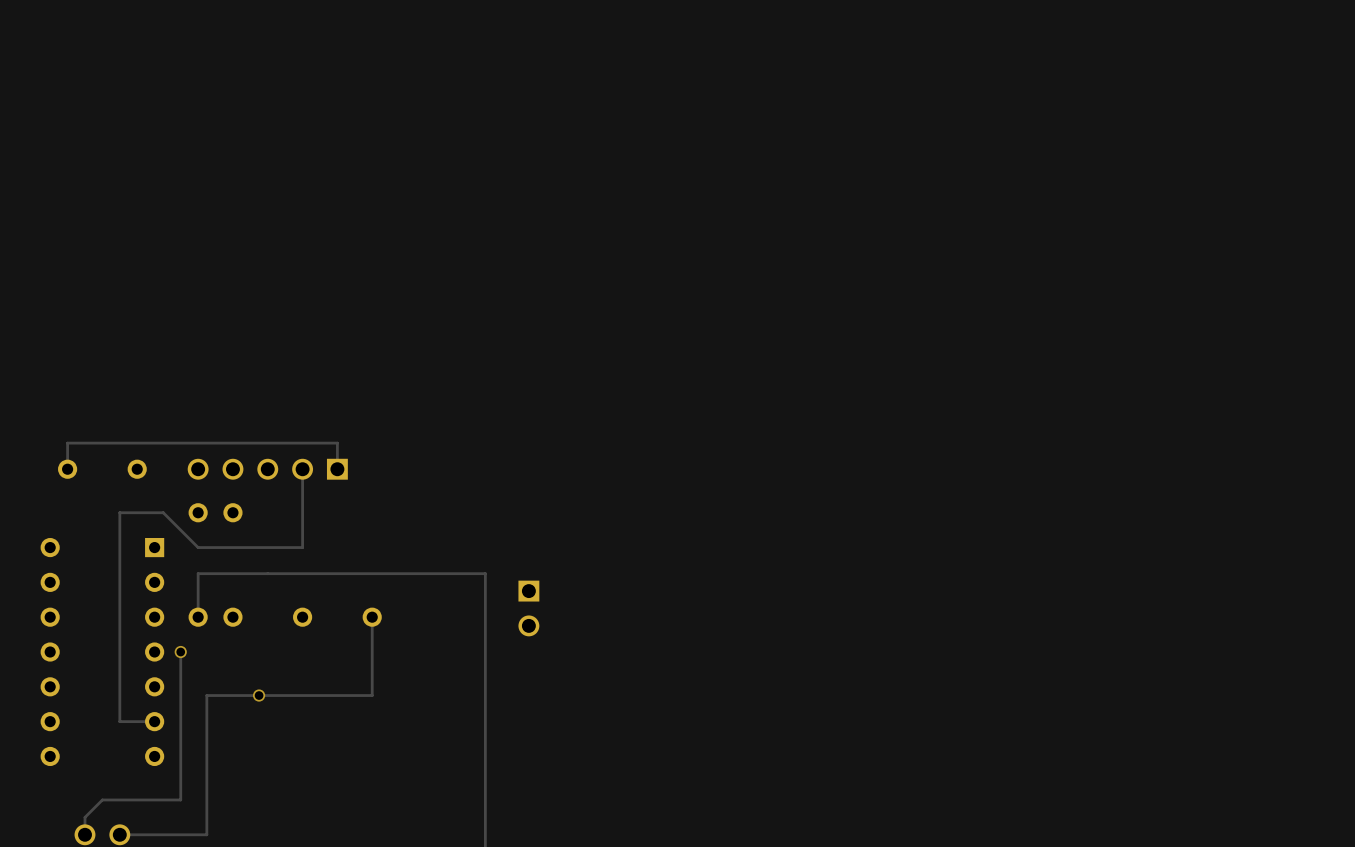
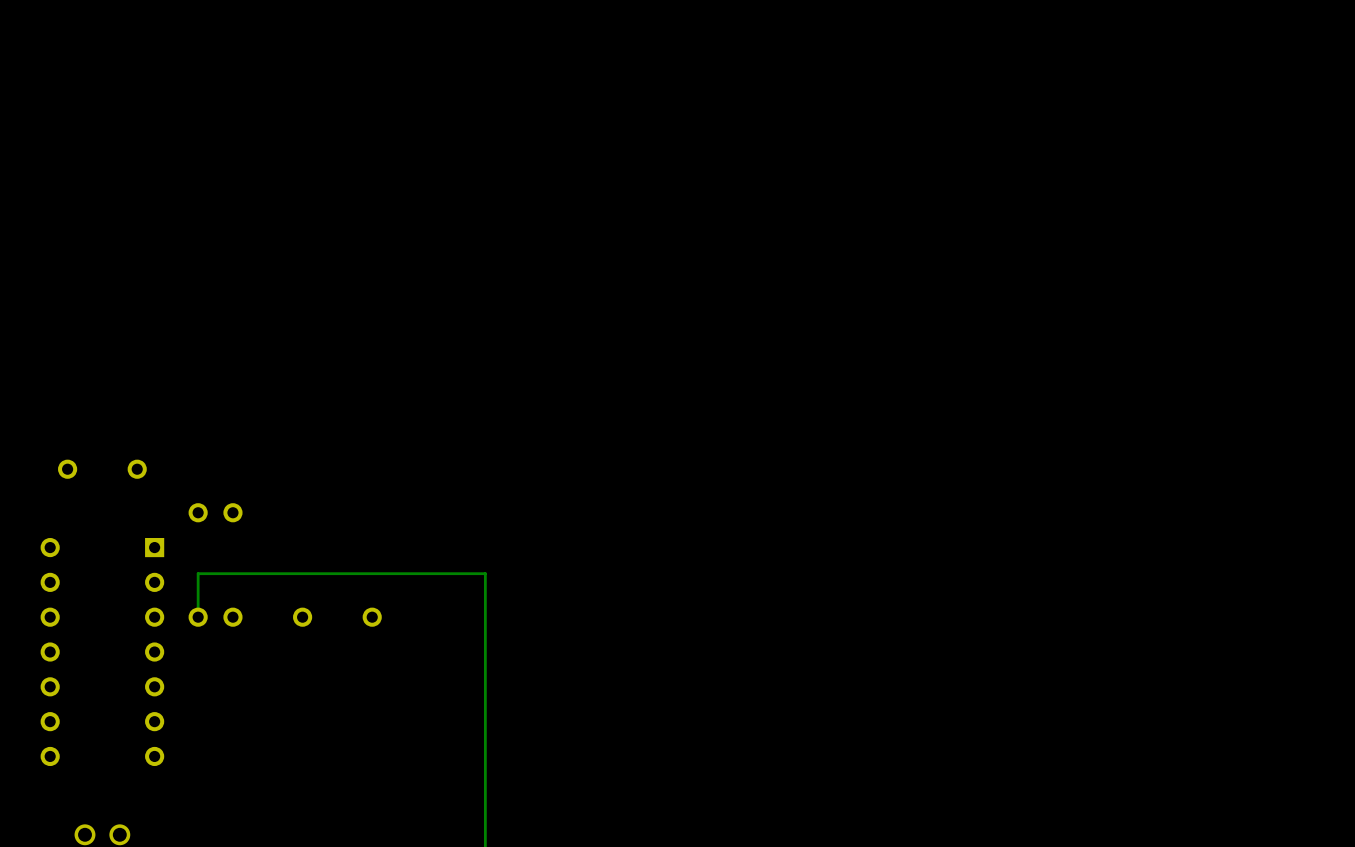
part: (267, 469) -> none
track: (302, 469) (302, 547) (198, 547) (163, 512) (119, 512) (119, 721) (154, 721) -> none
track: (337, 469) (337, 443) (67, 443) (67, 469) -> none
part: (528, 608) -> none
track: (372, 617) (372, 695) (206, 695) (206, 834) (119, 834) -> none
track: (180, 652) (180, 799) (102, 799) (85, 817) (85, 834) -> none
via: (180, 652) -> none
via: (259, 695) -> none

